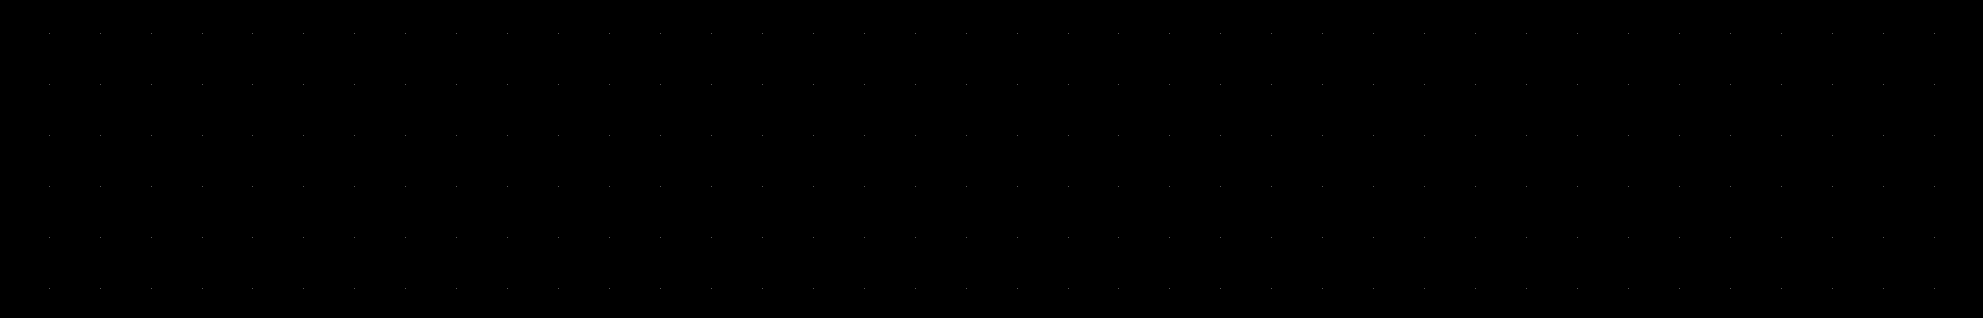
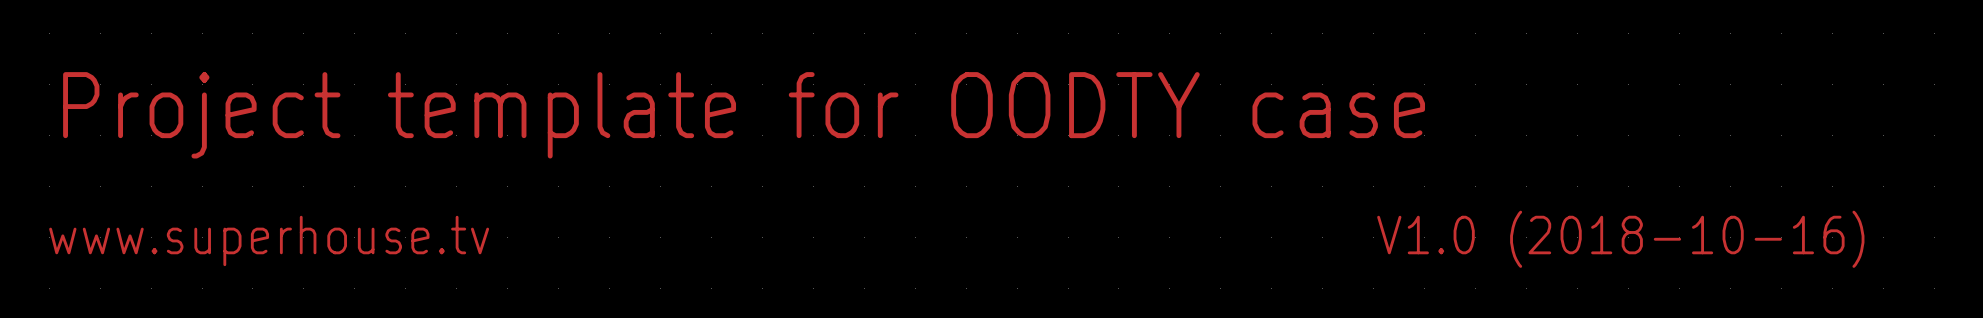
text: none -> Project template for OODTY case (744, 115)
text: none -> V1.0 (2018-10-16) (1620, 239)
text: none -> www.superhouse.tv (269, 240)

